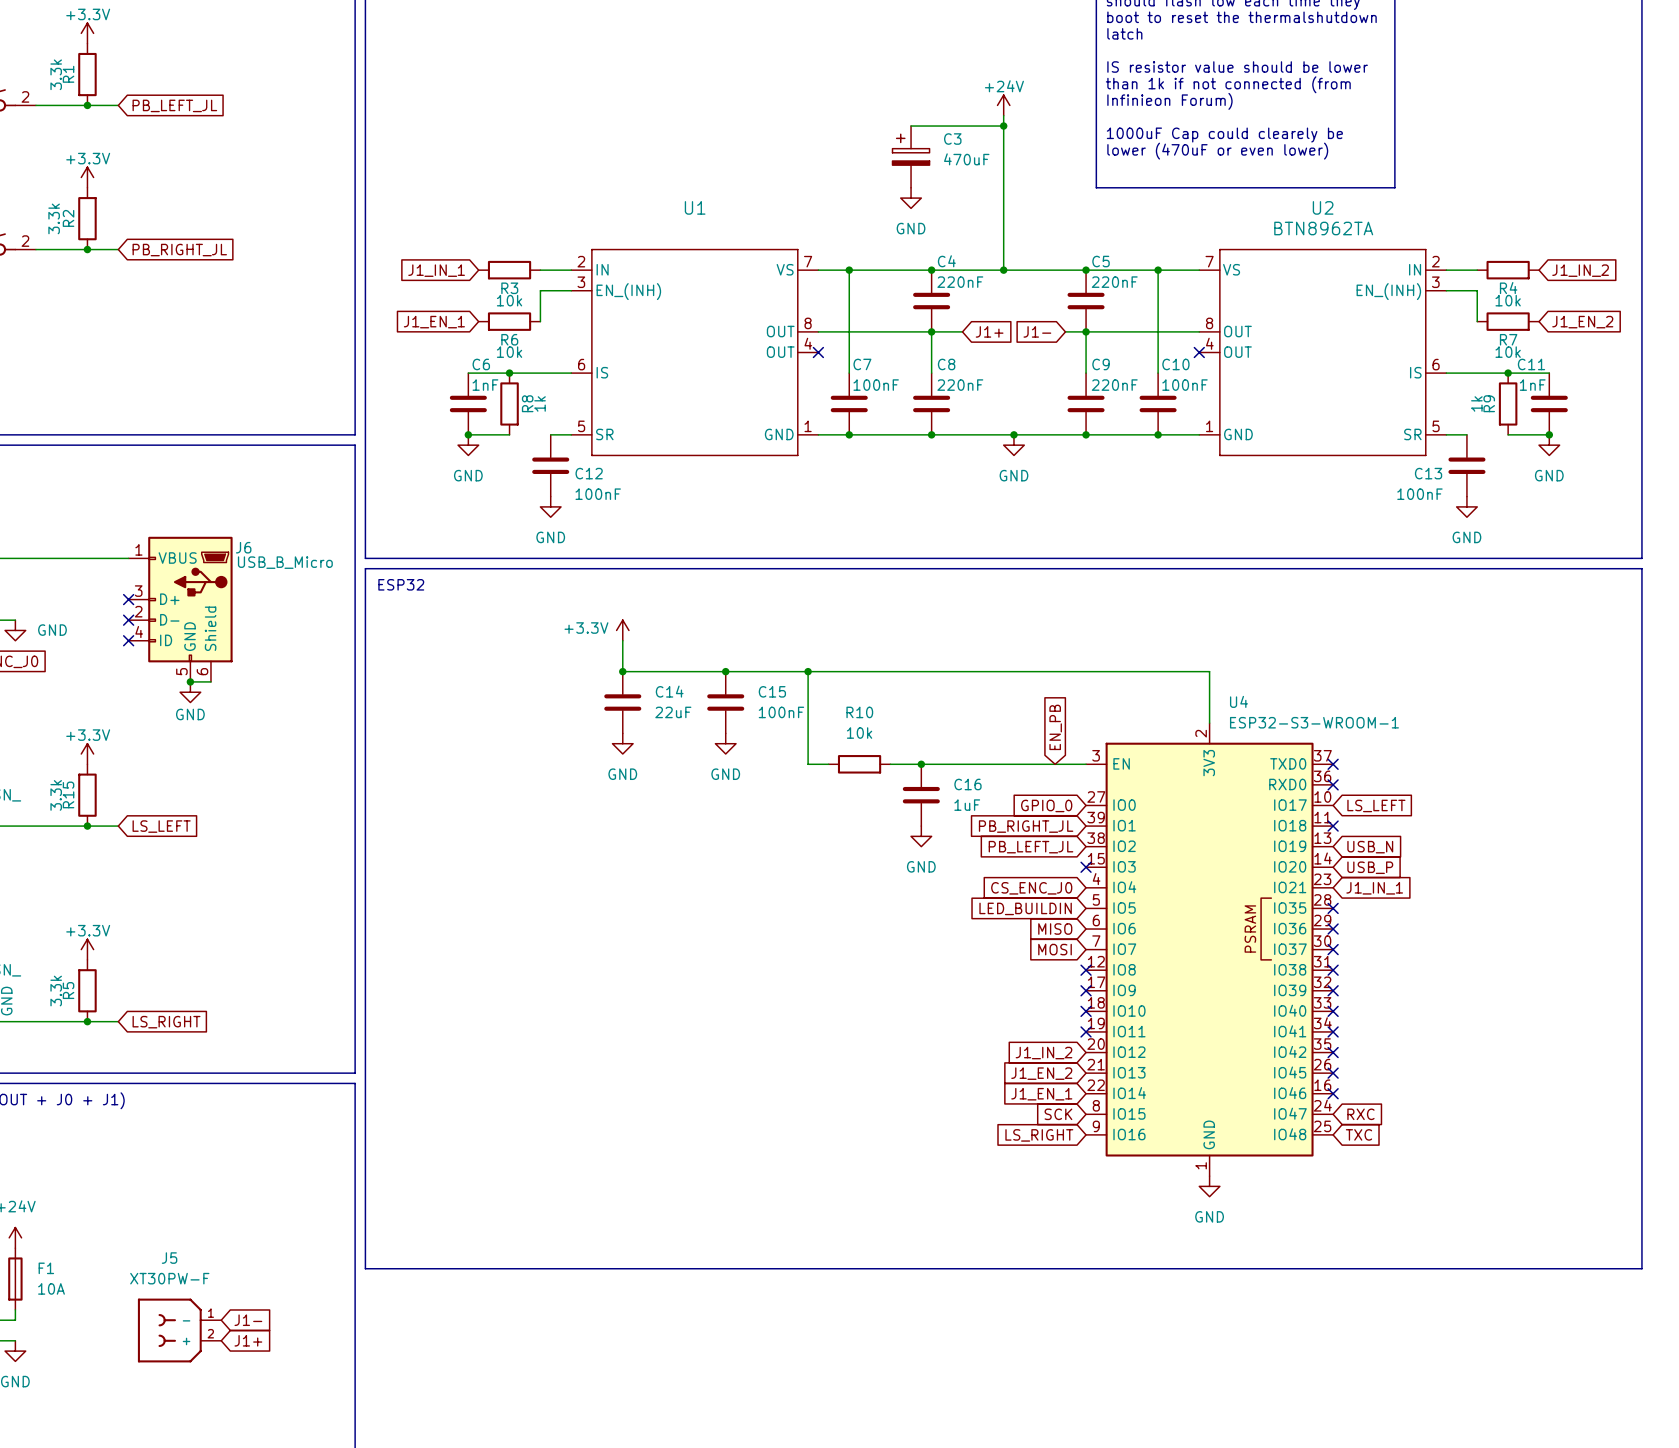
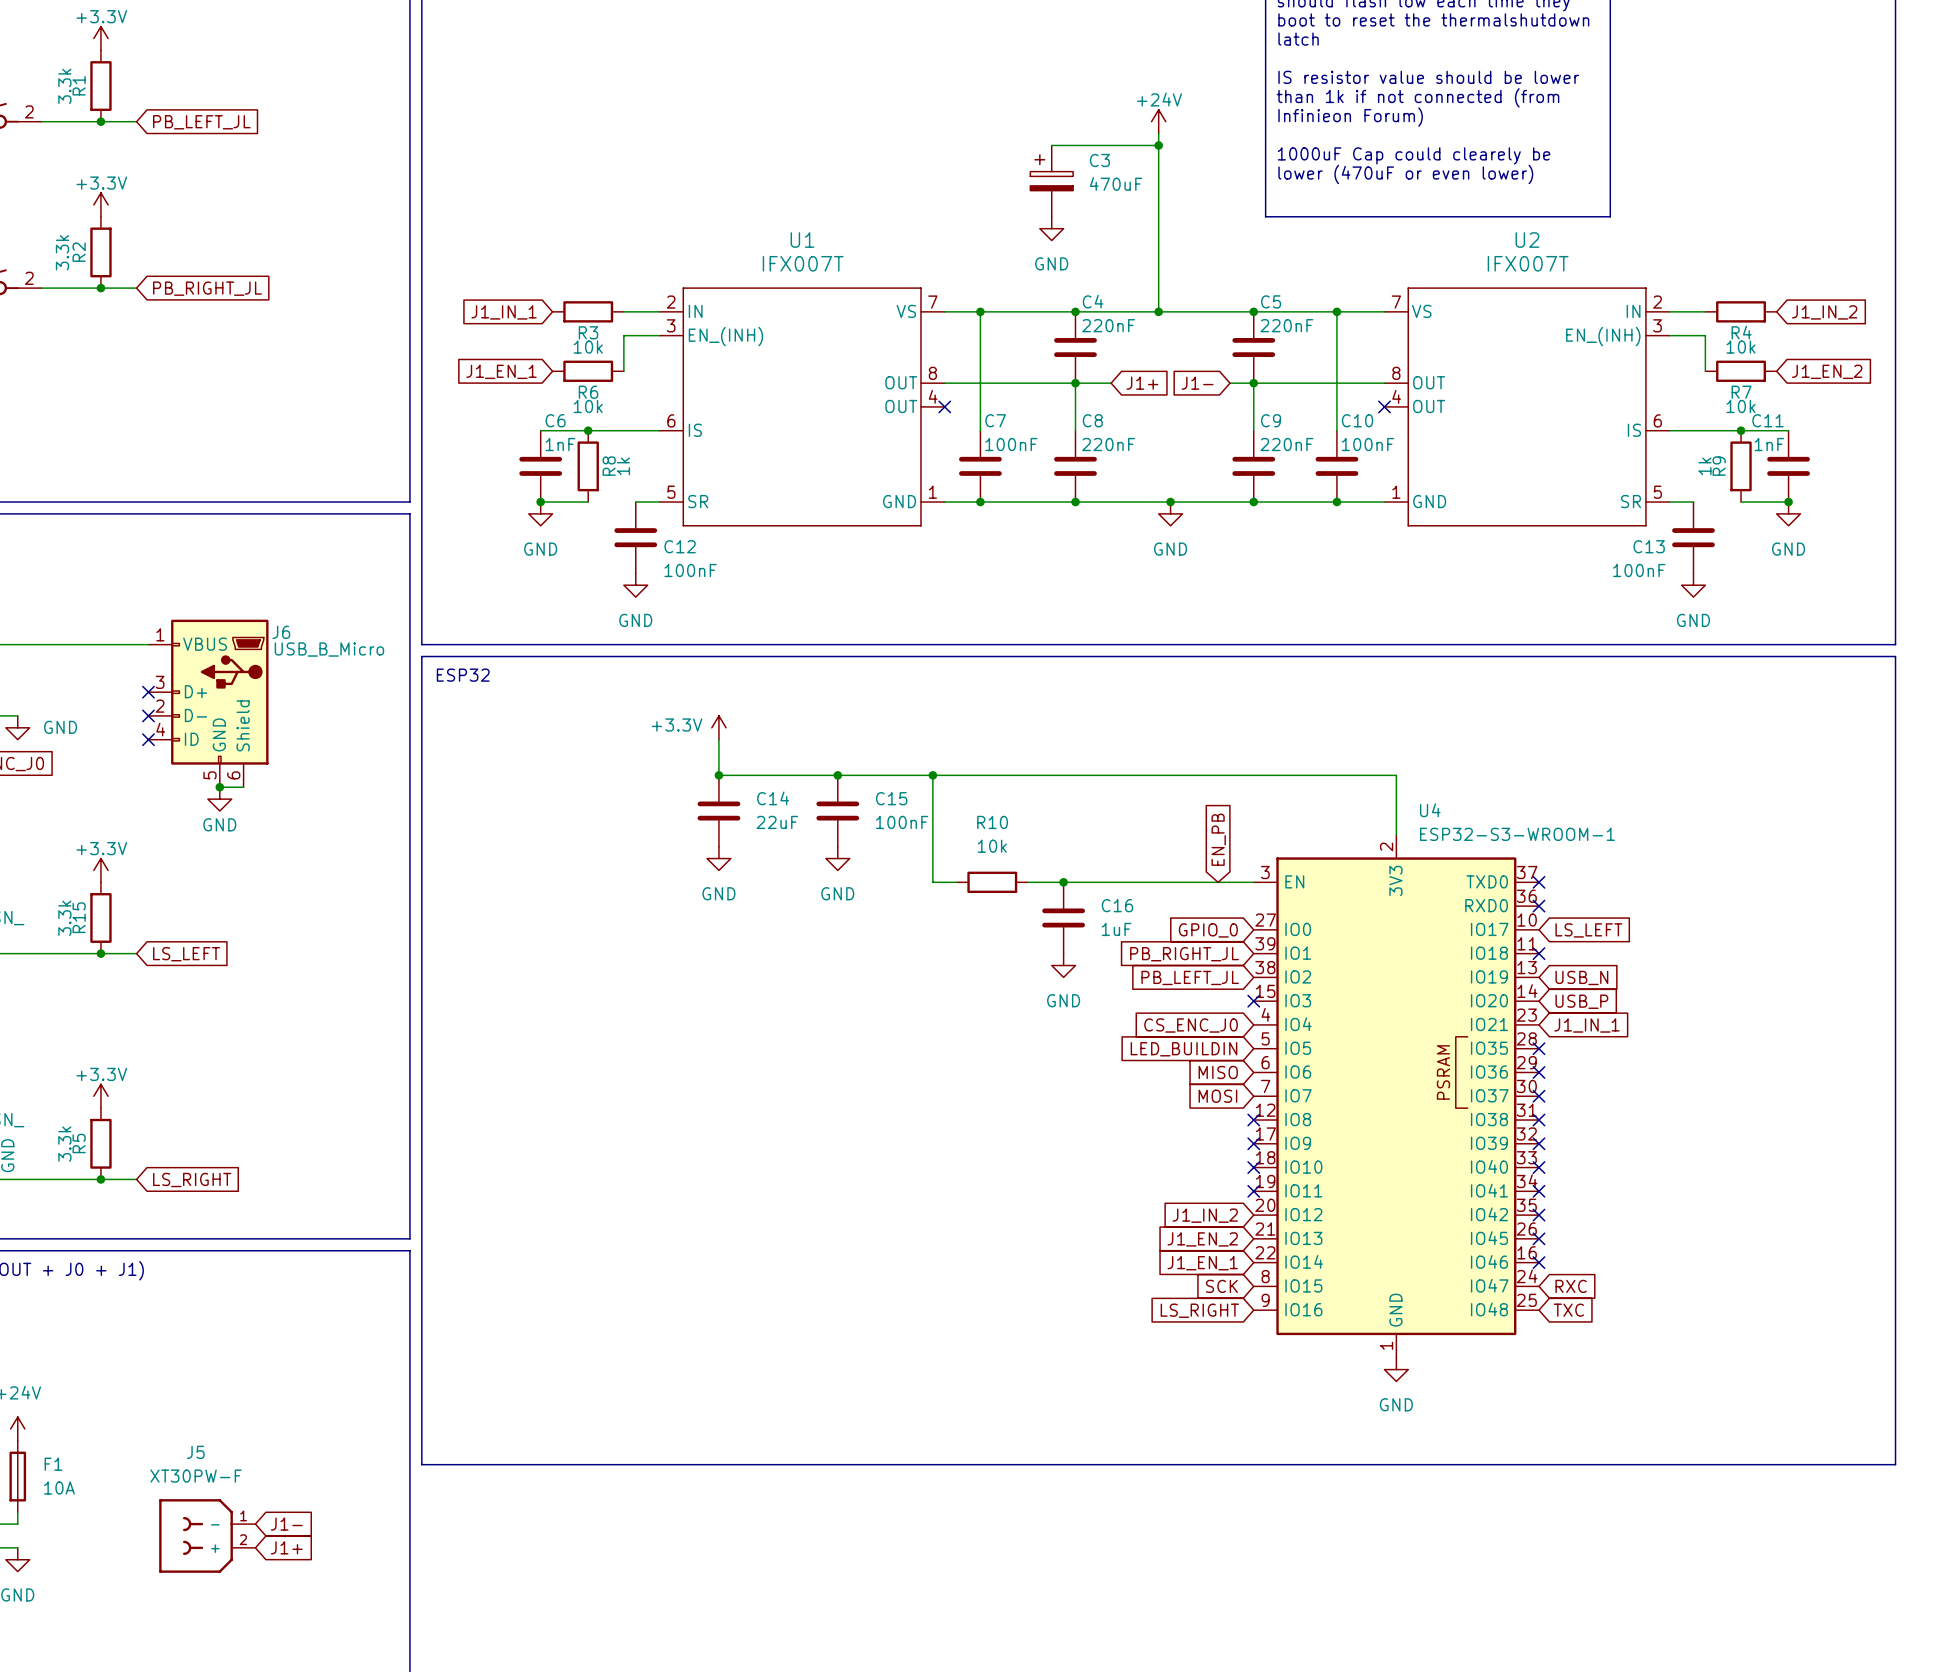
U1 value: none -> IFX007T (803, 263)
U2 value: BTN8962TA (1323, 228) -> IFX007T (1528, 263)

